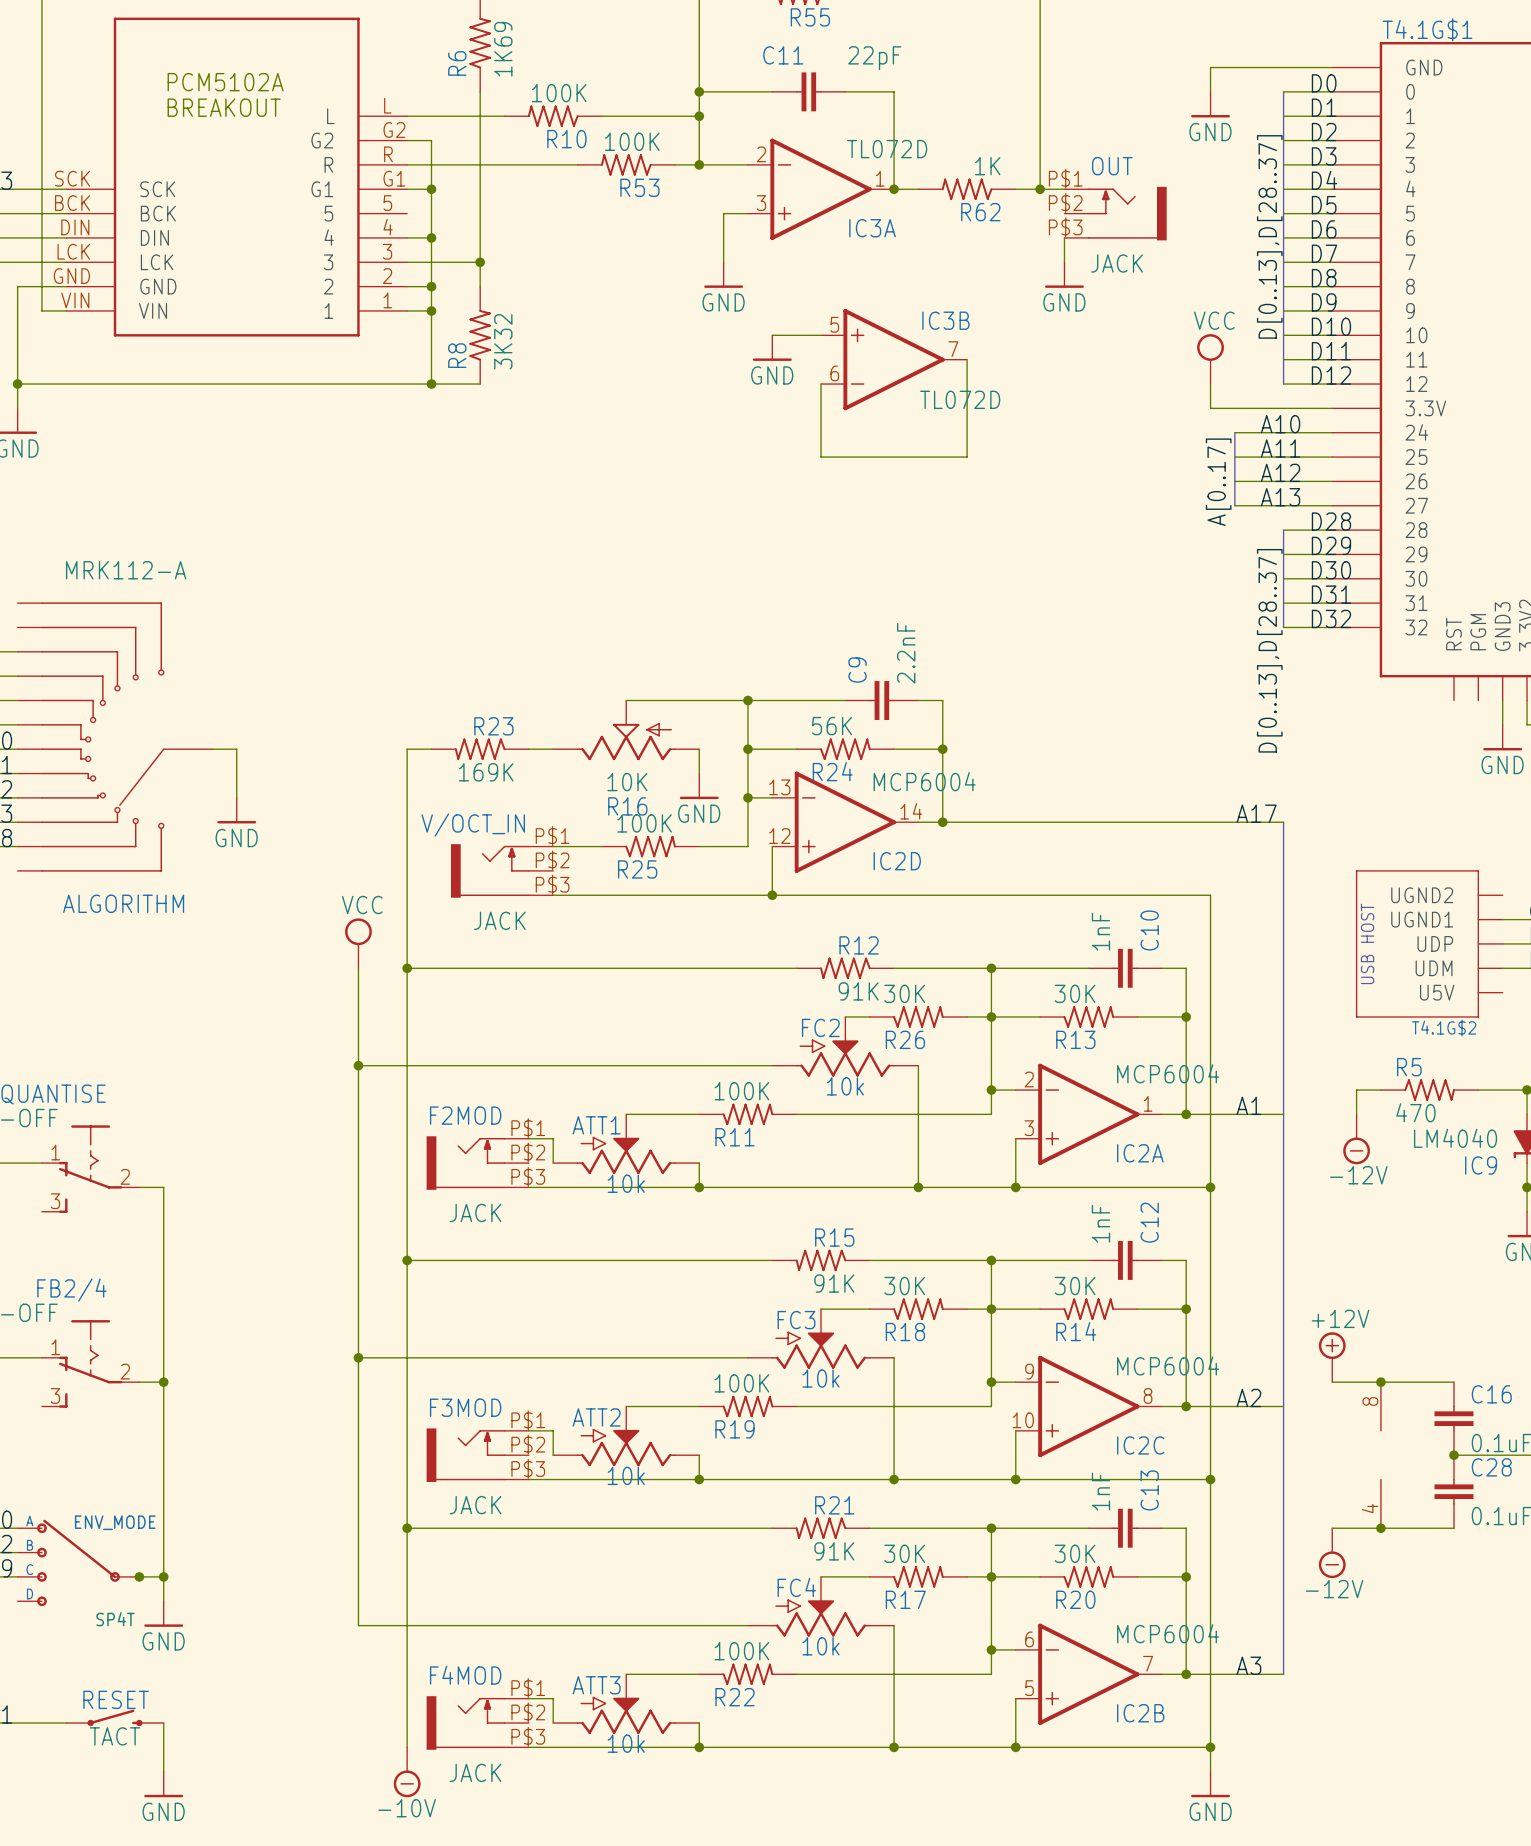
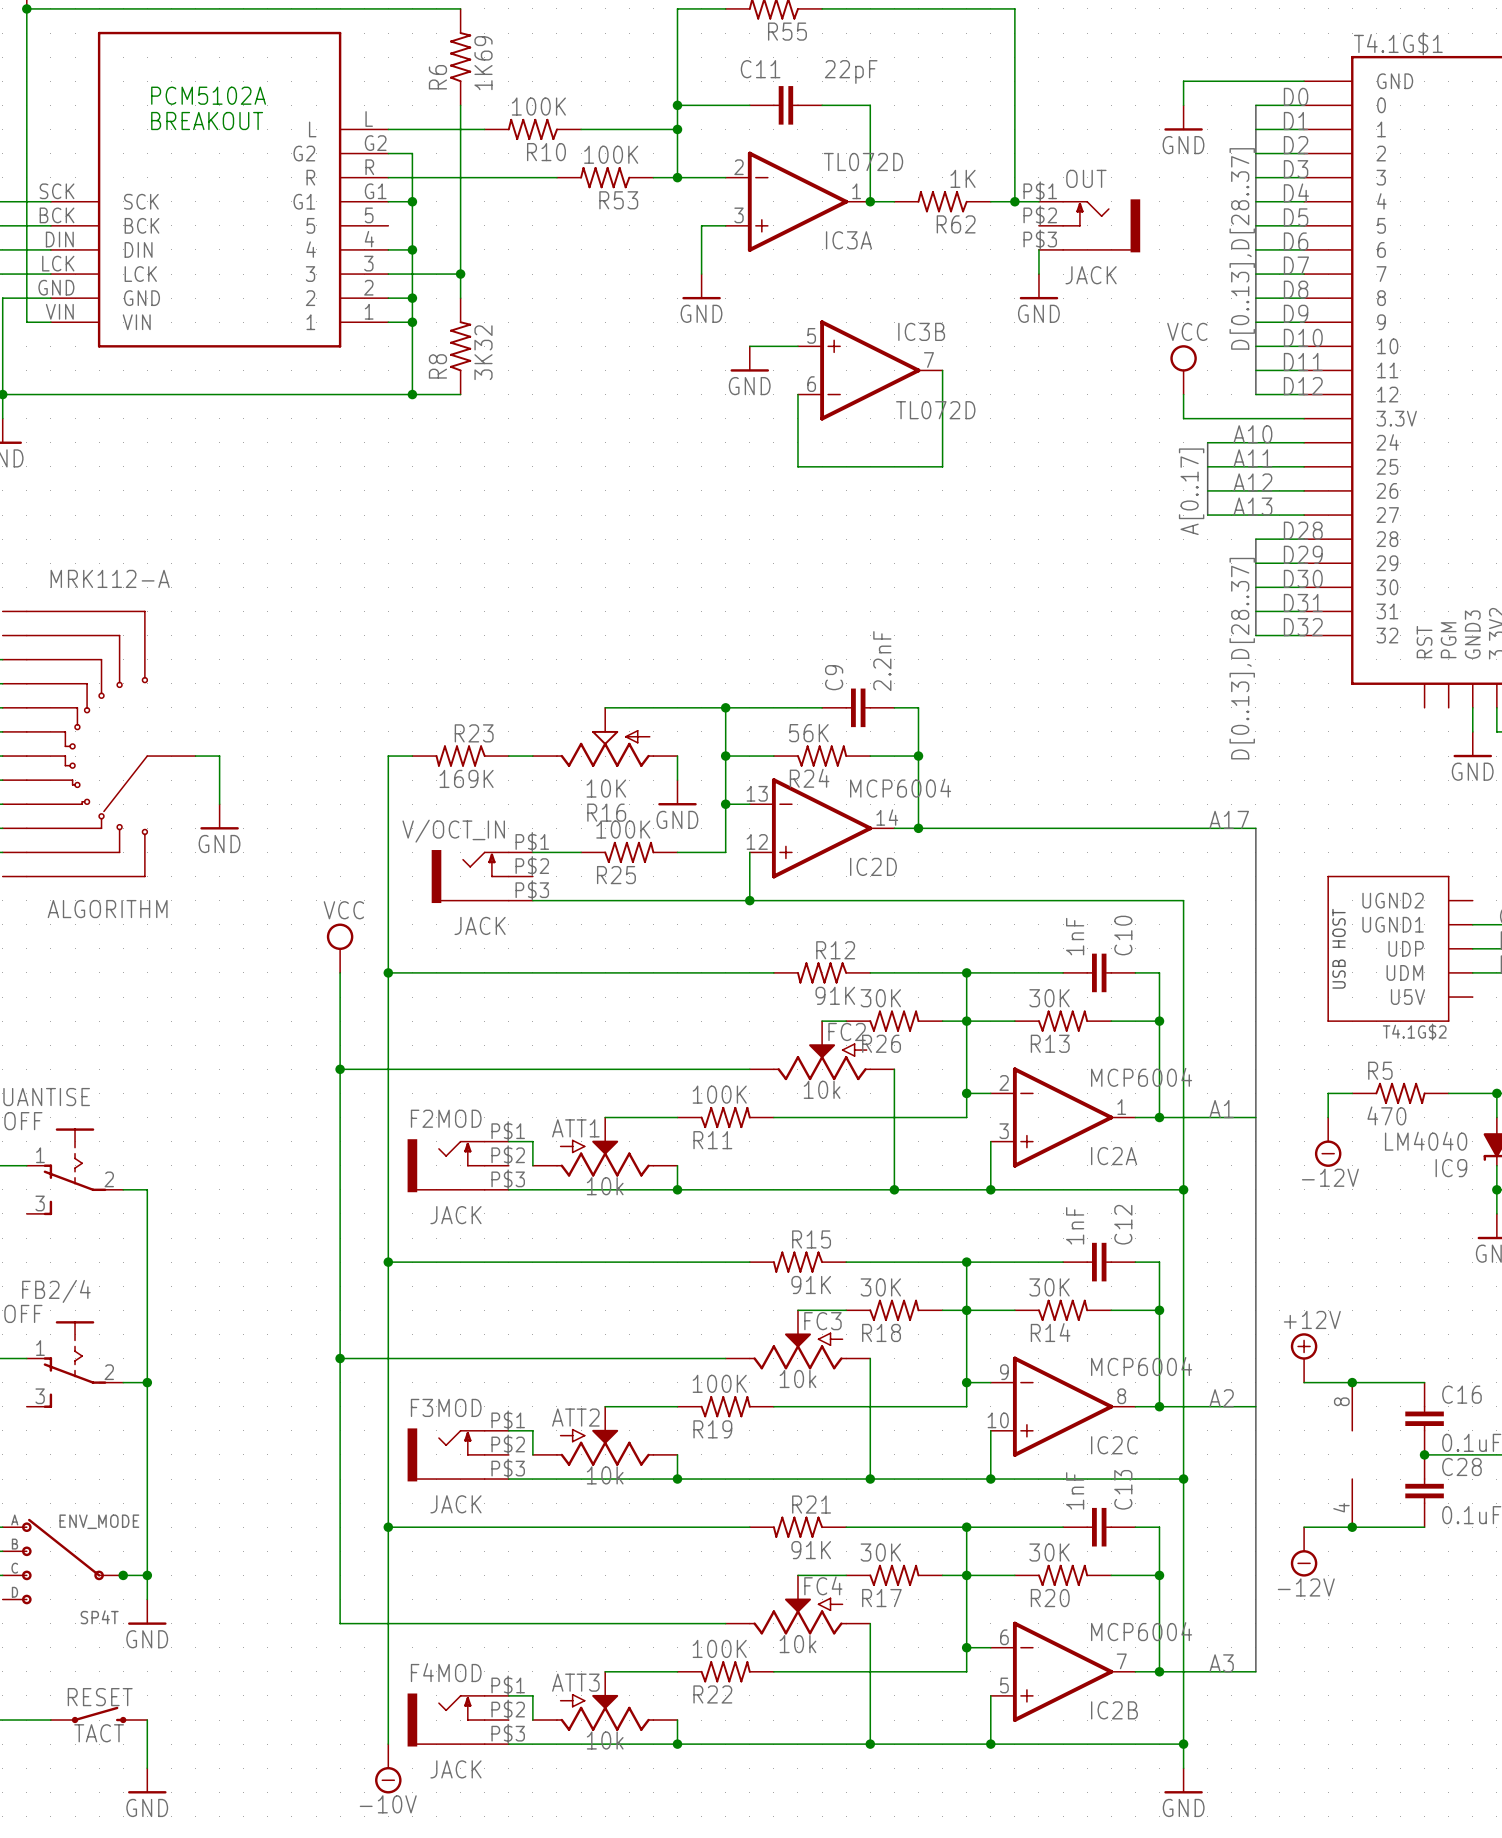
FC2 flip: as is (845, 1058) -> left-right (822, 1061)
FC3 flip: as is (821, 1350) -> left-right (797, 1350)
FC4 flip: as is (821, 1617) -> left-right (797, 1616)

